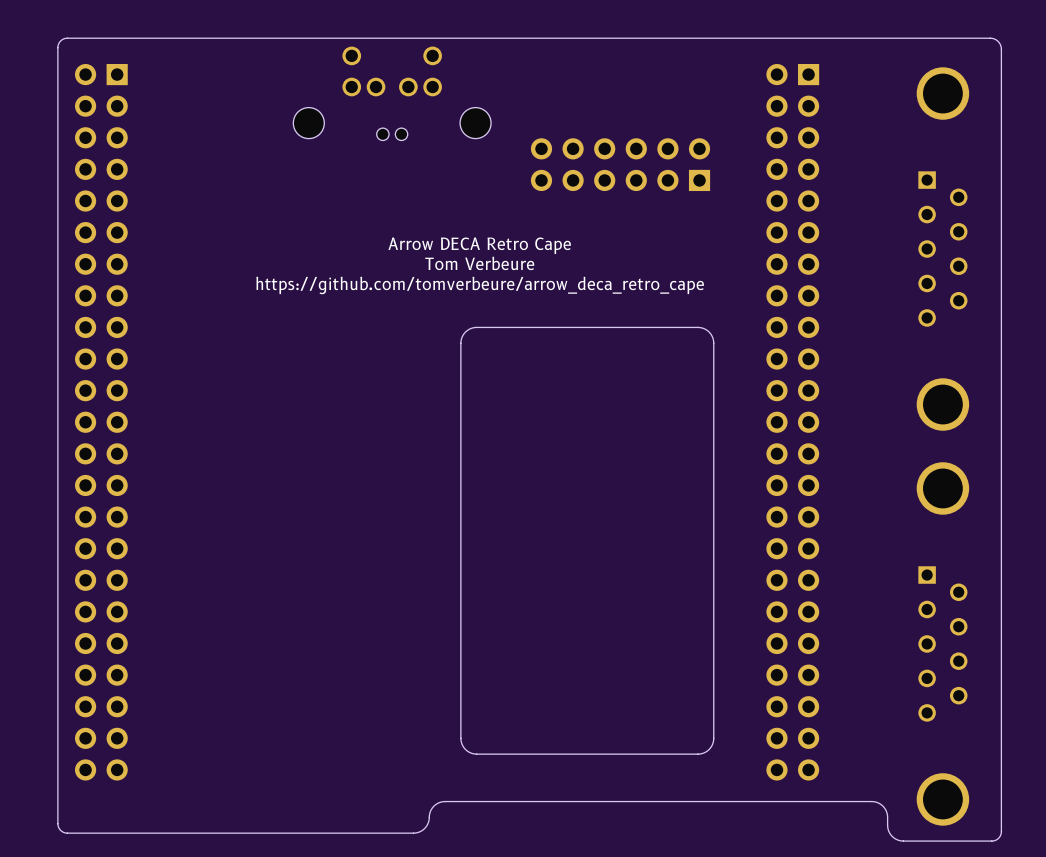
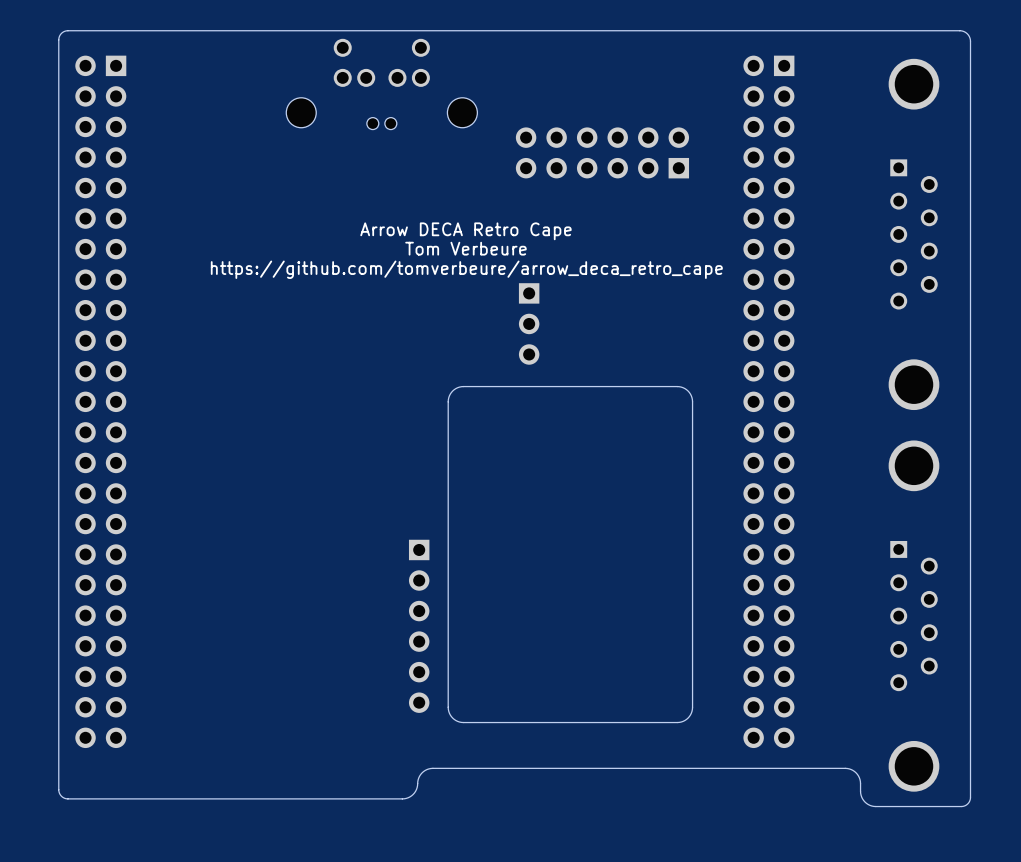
part: none -> (529, 323)
board edge: (713, 422) (713, 341) (709, 332) (697, 327) (470, 328) (464, 333) (461, 341) (460, 422) -> (692, 401) (688, 391) (677, 386) (461, 386) (451, 392) (448, 401)
part: none -> (419, 626)

